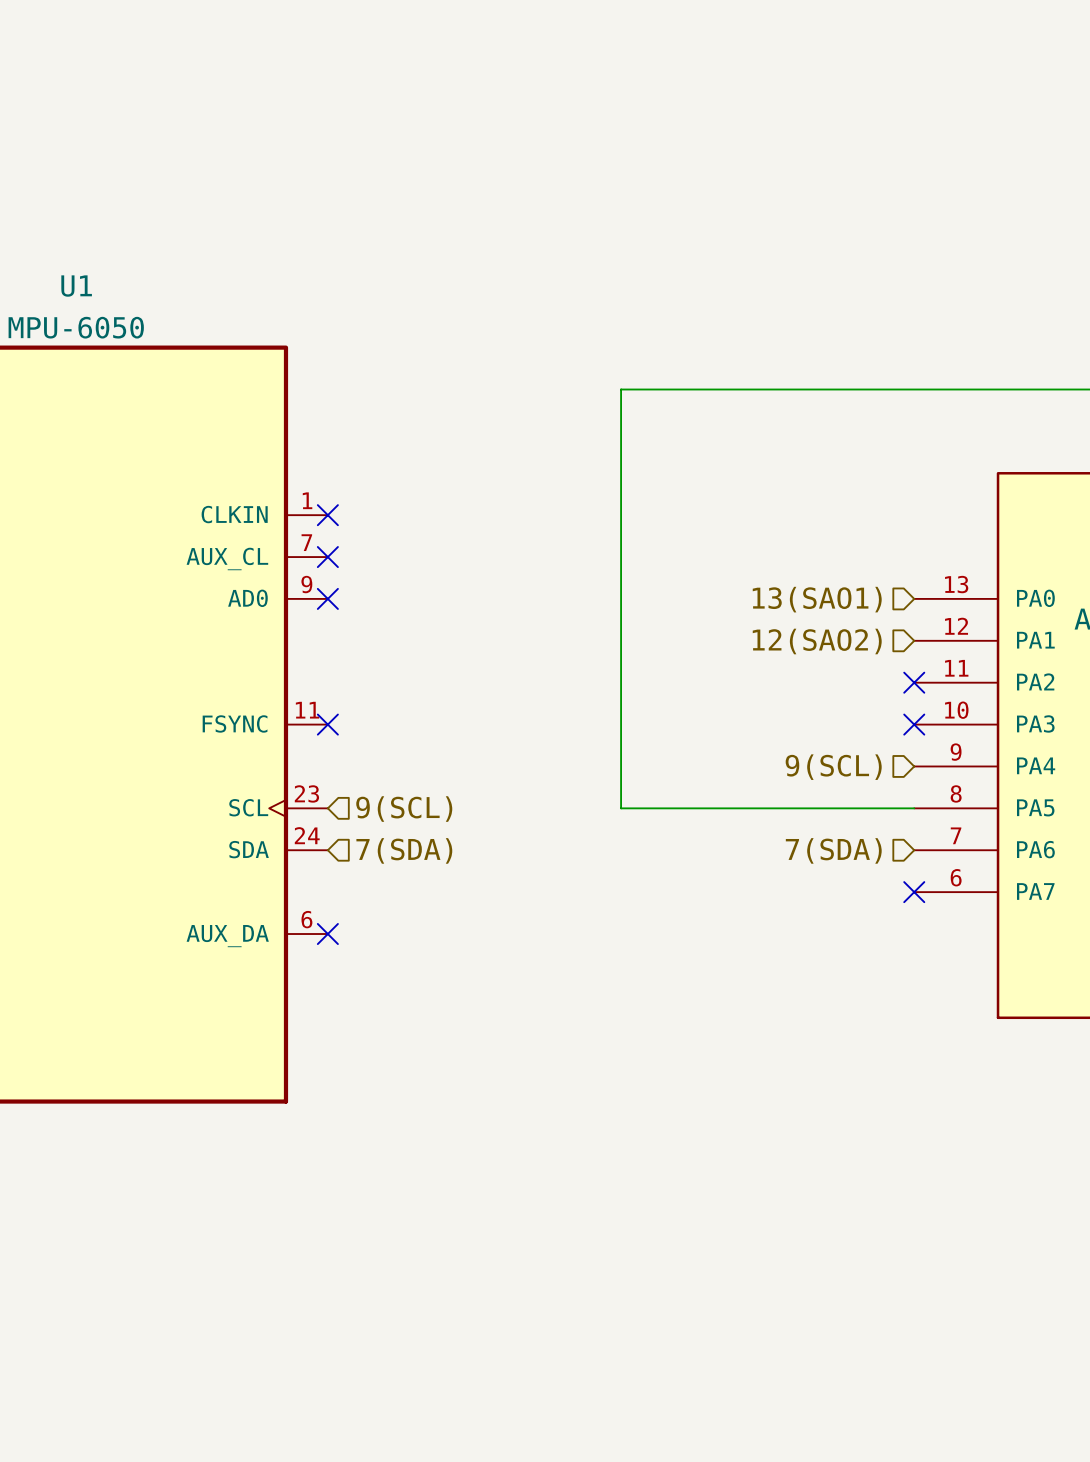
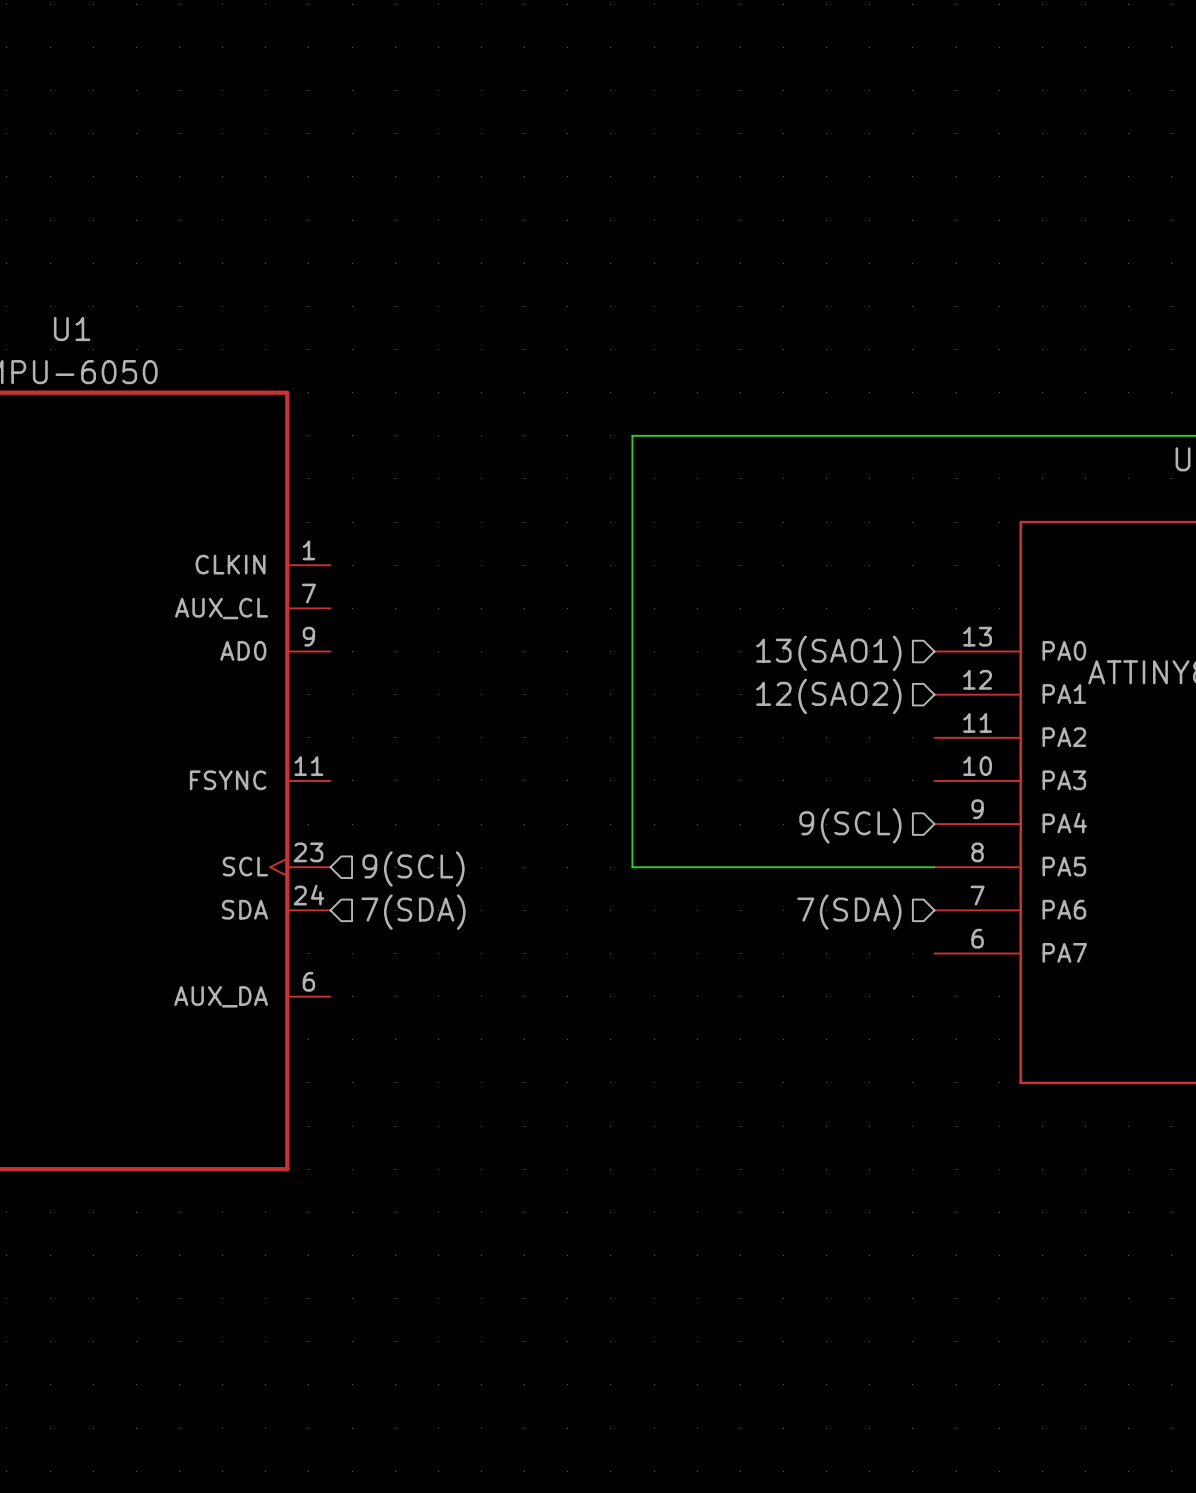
no-connect mark: (327, 515) -> none
no-connect mark: (327, 557) -> none
no-connect mark: (327, 598) -> none
no-connect mark: (914, 682) -> none
no-connect mark: (327, 724) -> none
no-connect mark: (914, 724) -> none
no-connect mark: (914, 892) -> none
no-connect mark: (327, 934) -> none

